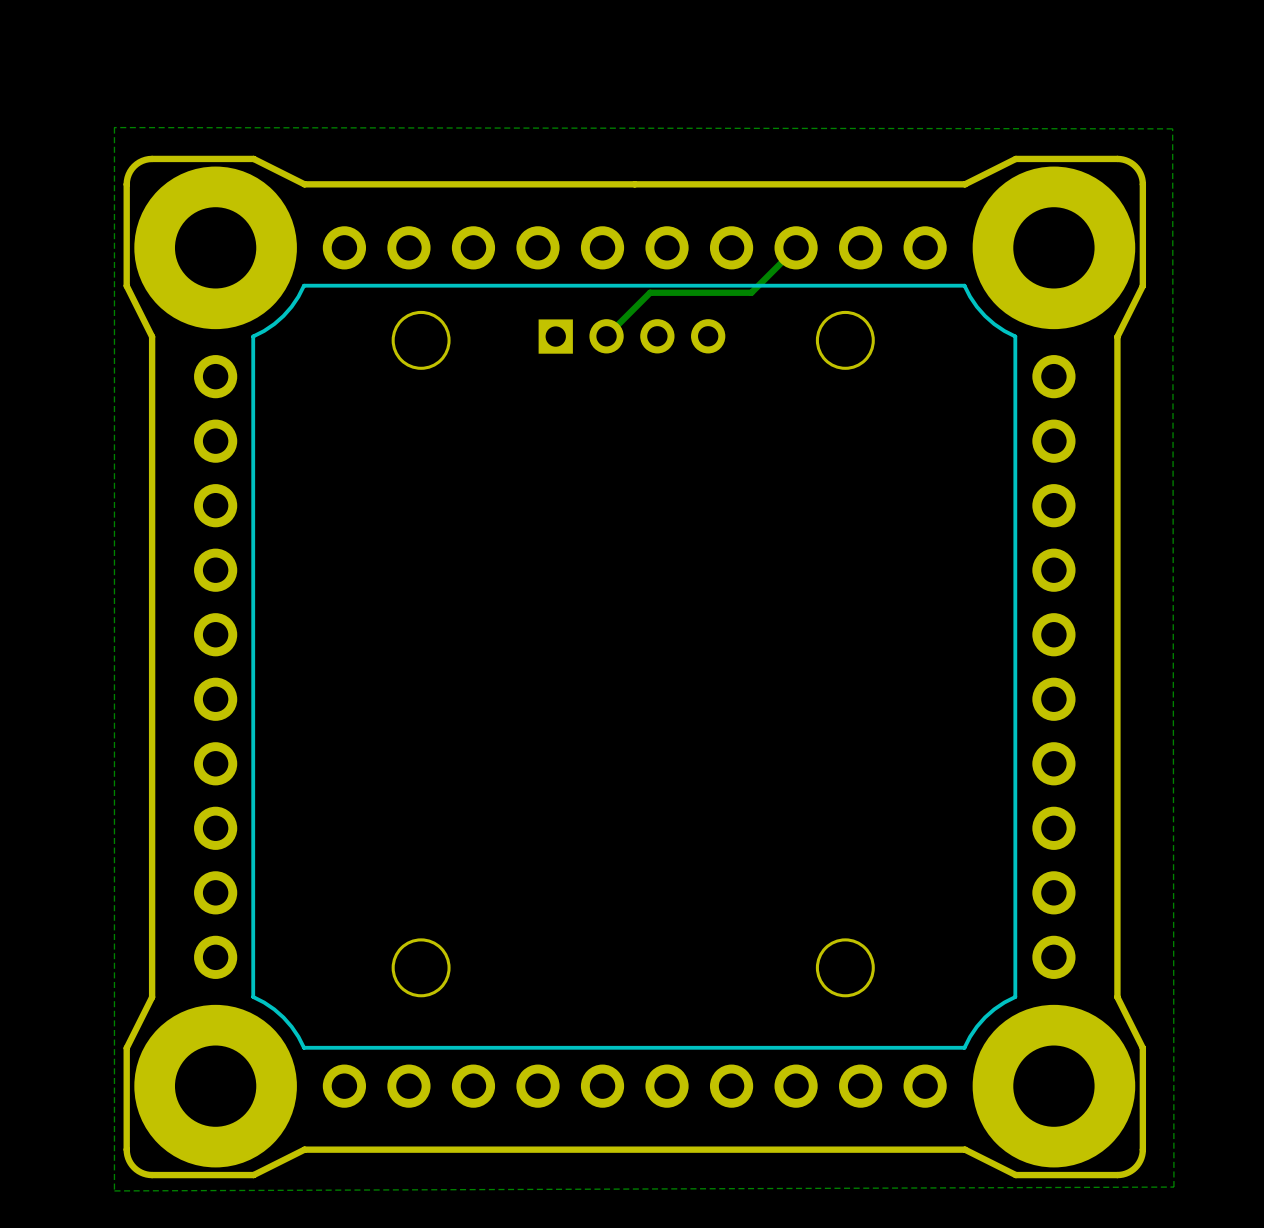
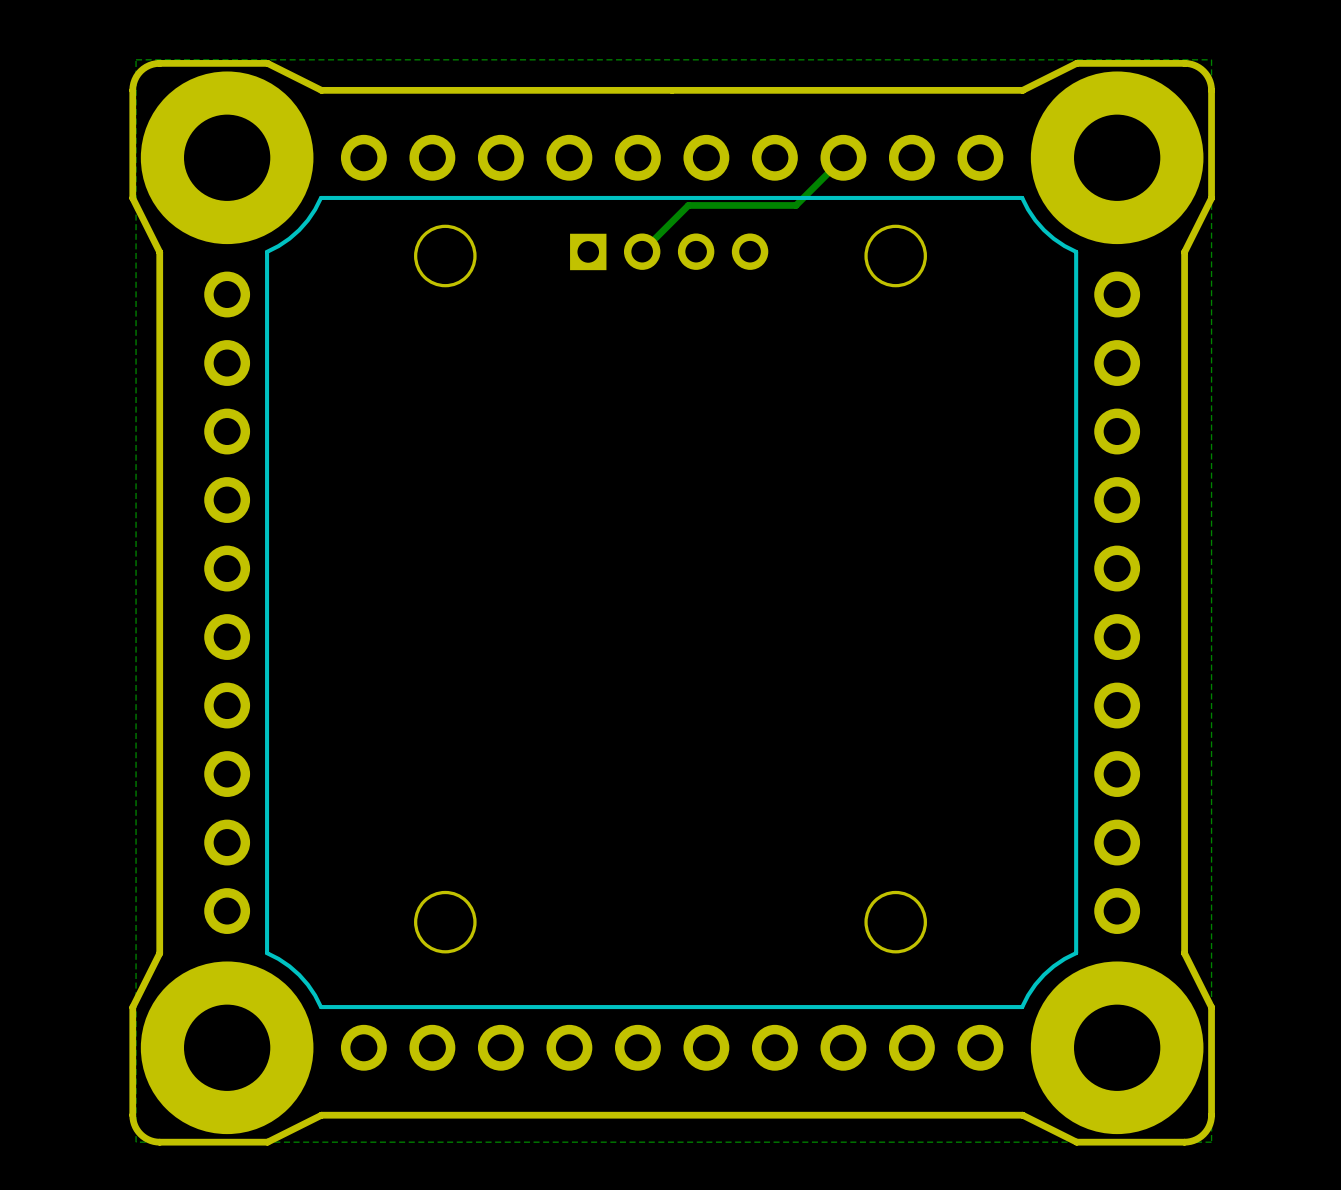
zone outline: (114, 127) (1172, 128) (1173, 1187) (114, 1190) (114, 127) -> (1211, 59) (1211, 1142) (136, 1142) (136, 59) (1211, 59)

